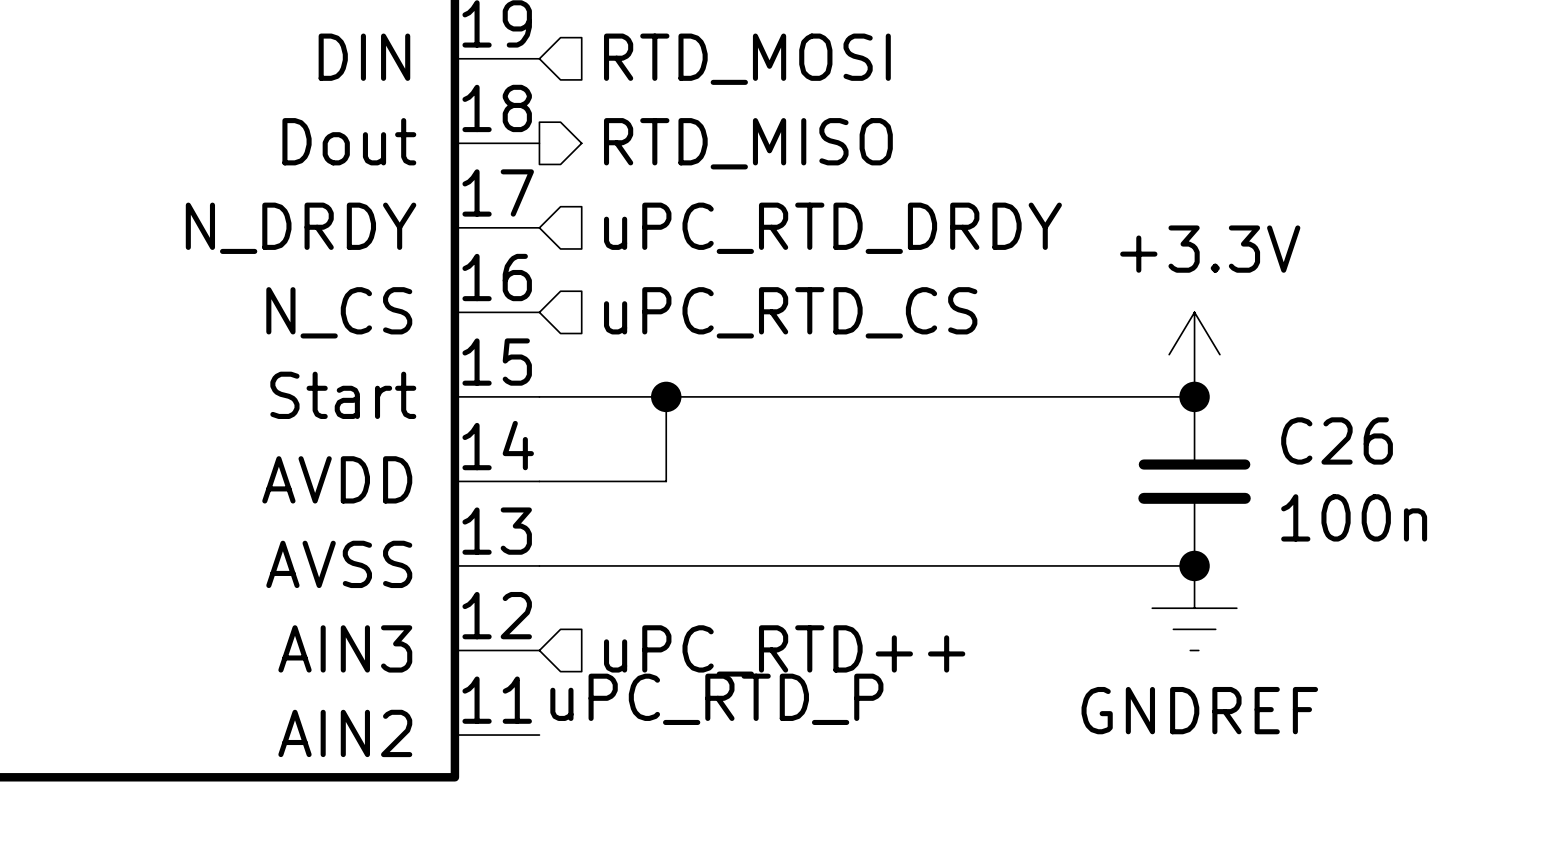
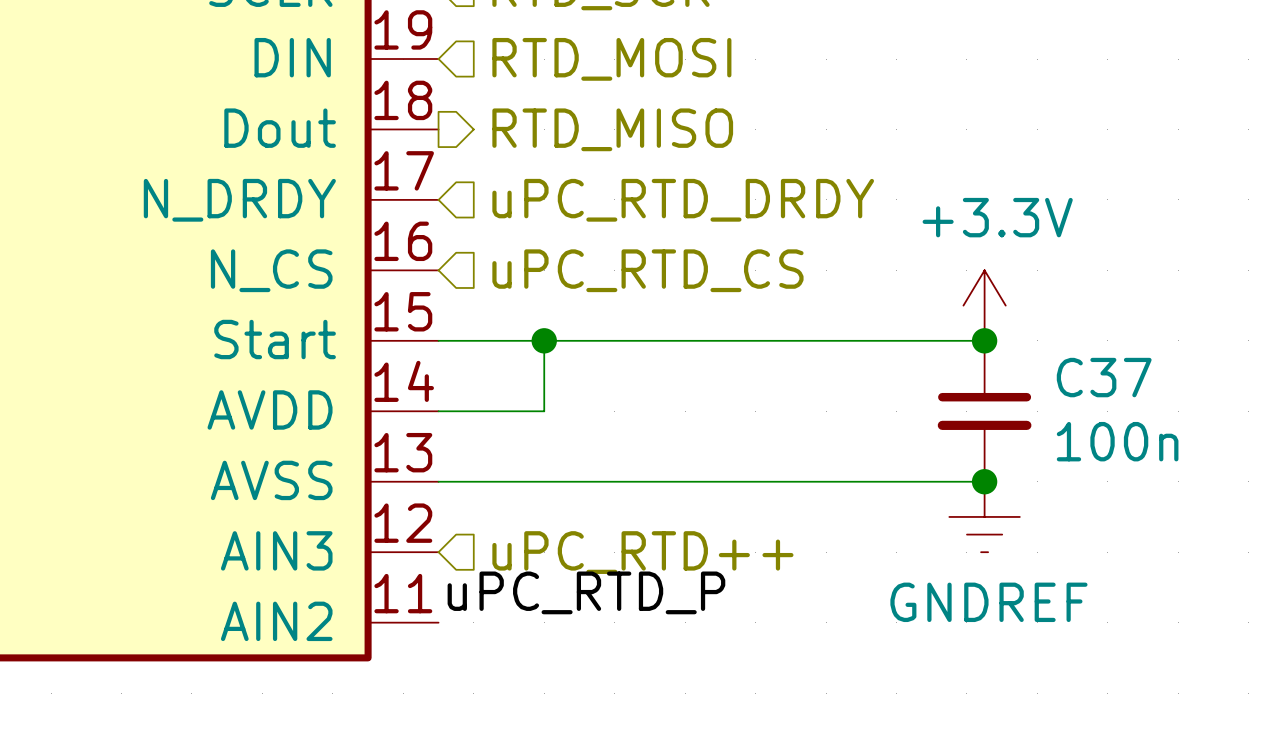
C26 name: C26 (1337, 440) -> C37 (1104, 377)

